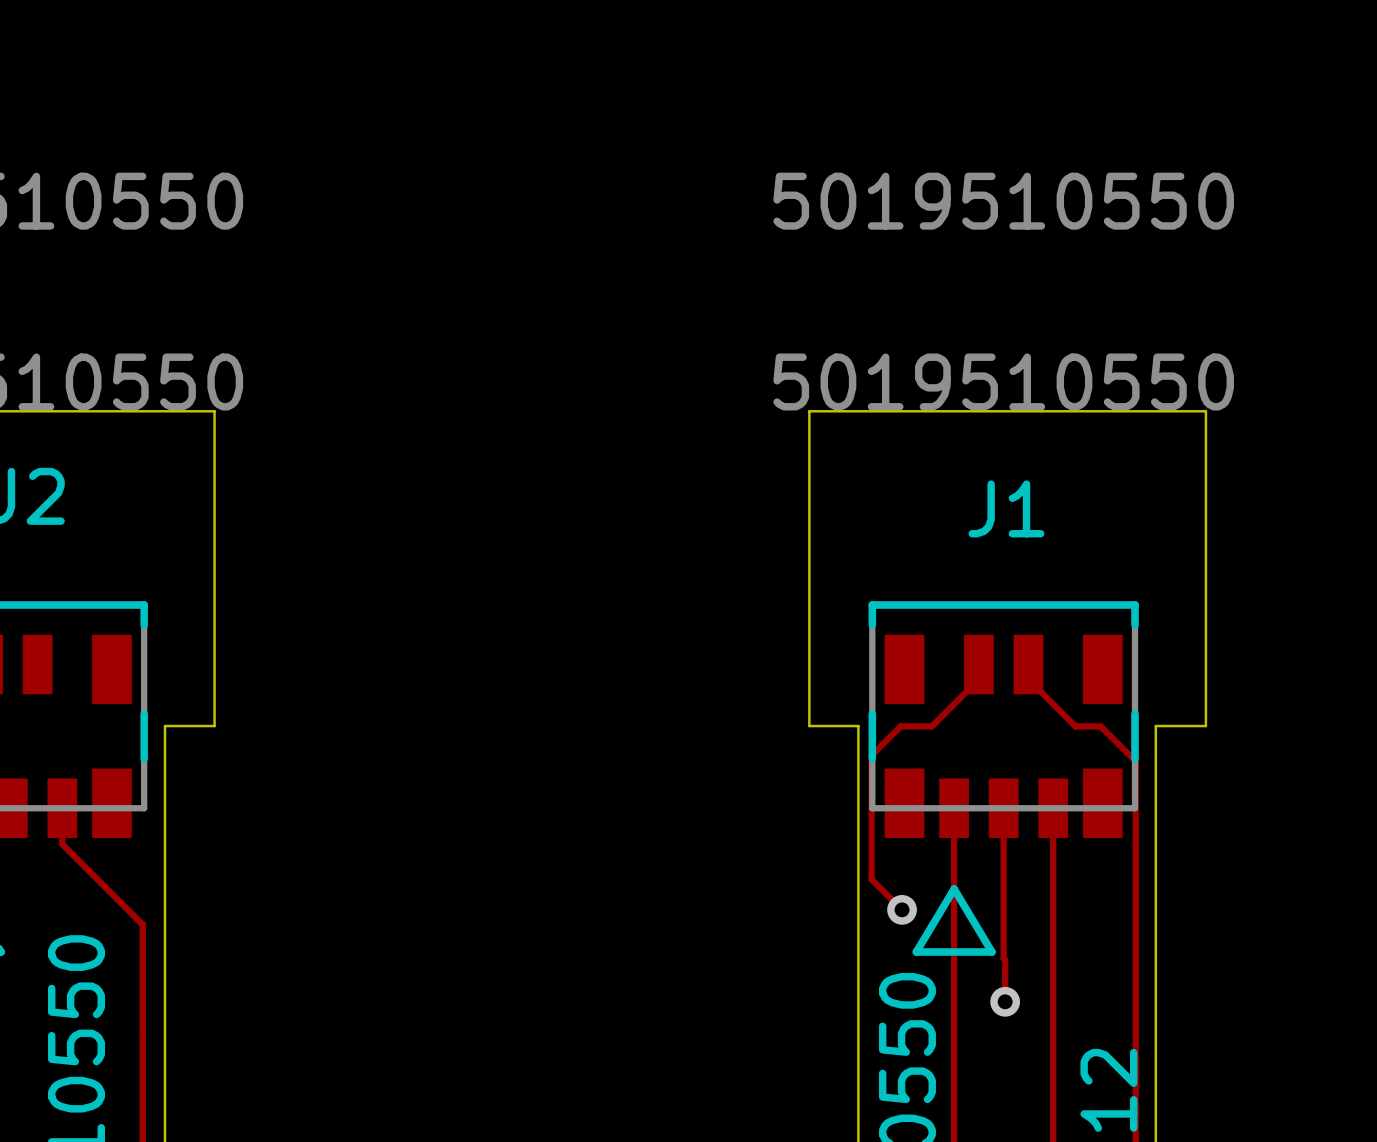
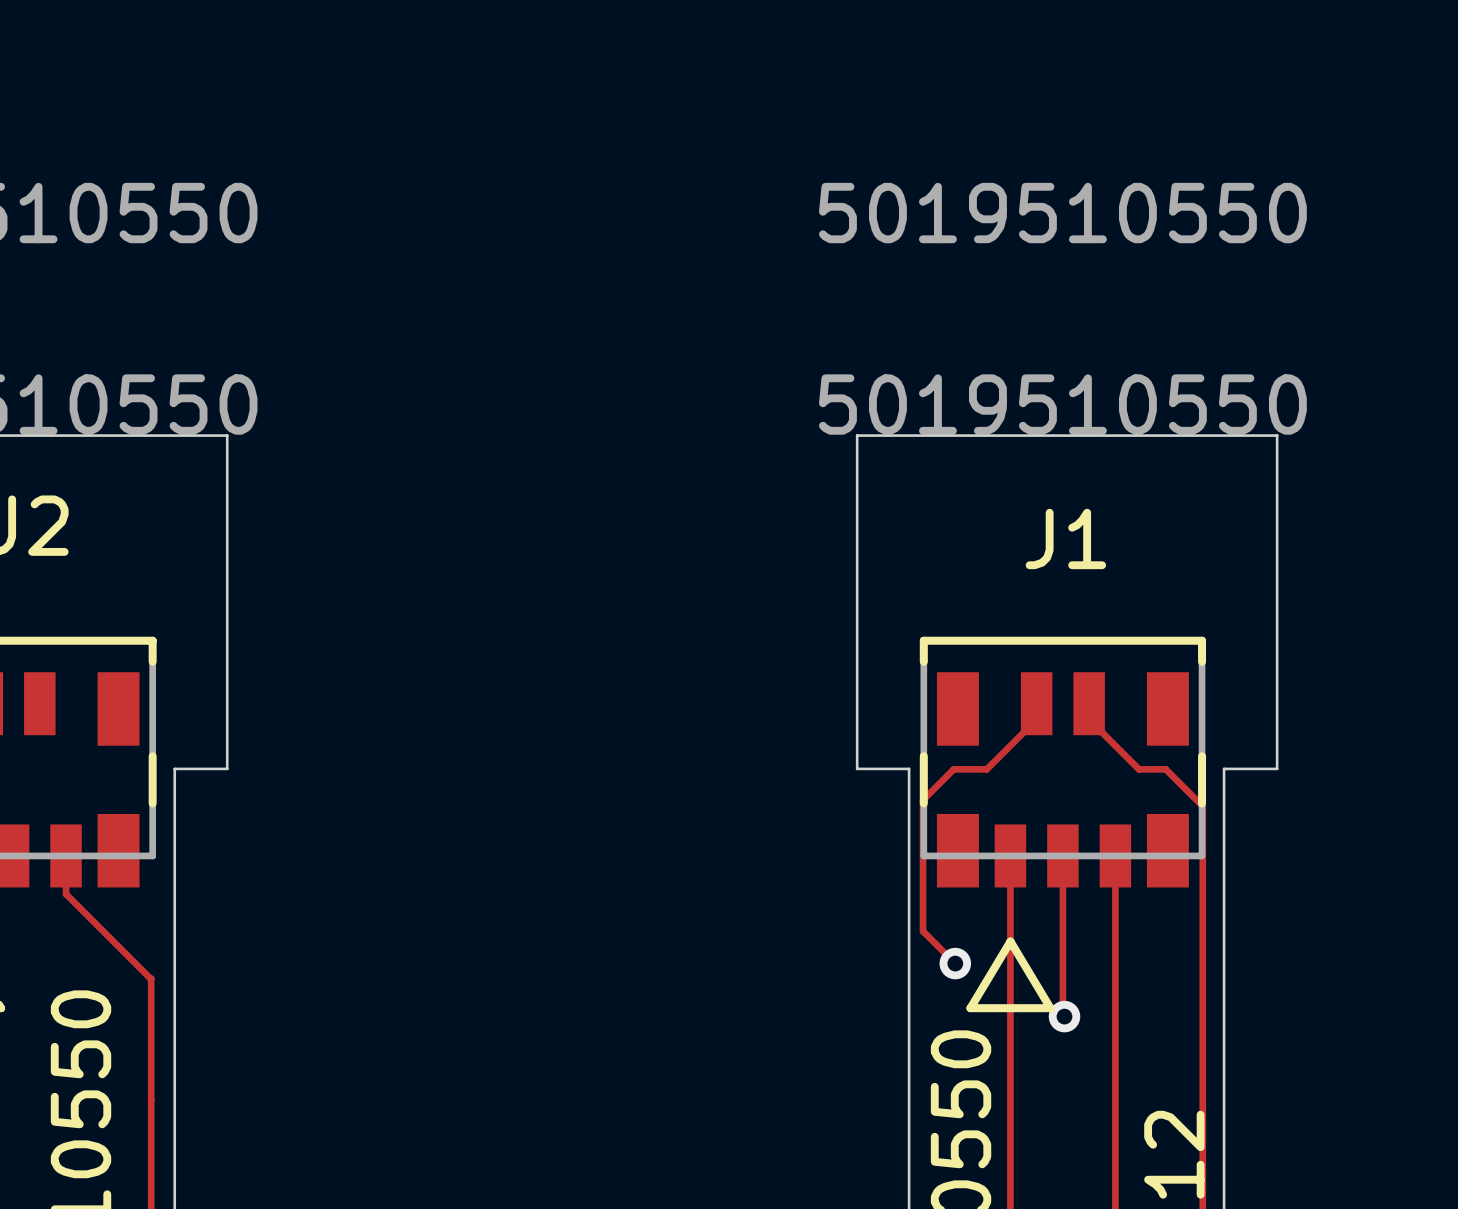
track: (1005, 959) (1005, 1001) -> none
via position: (1005, 1001) -> (1064, 1016)

